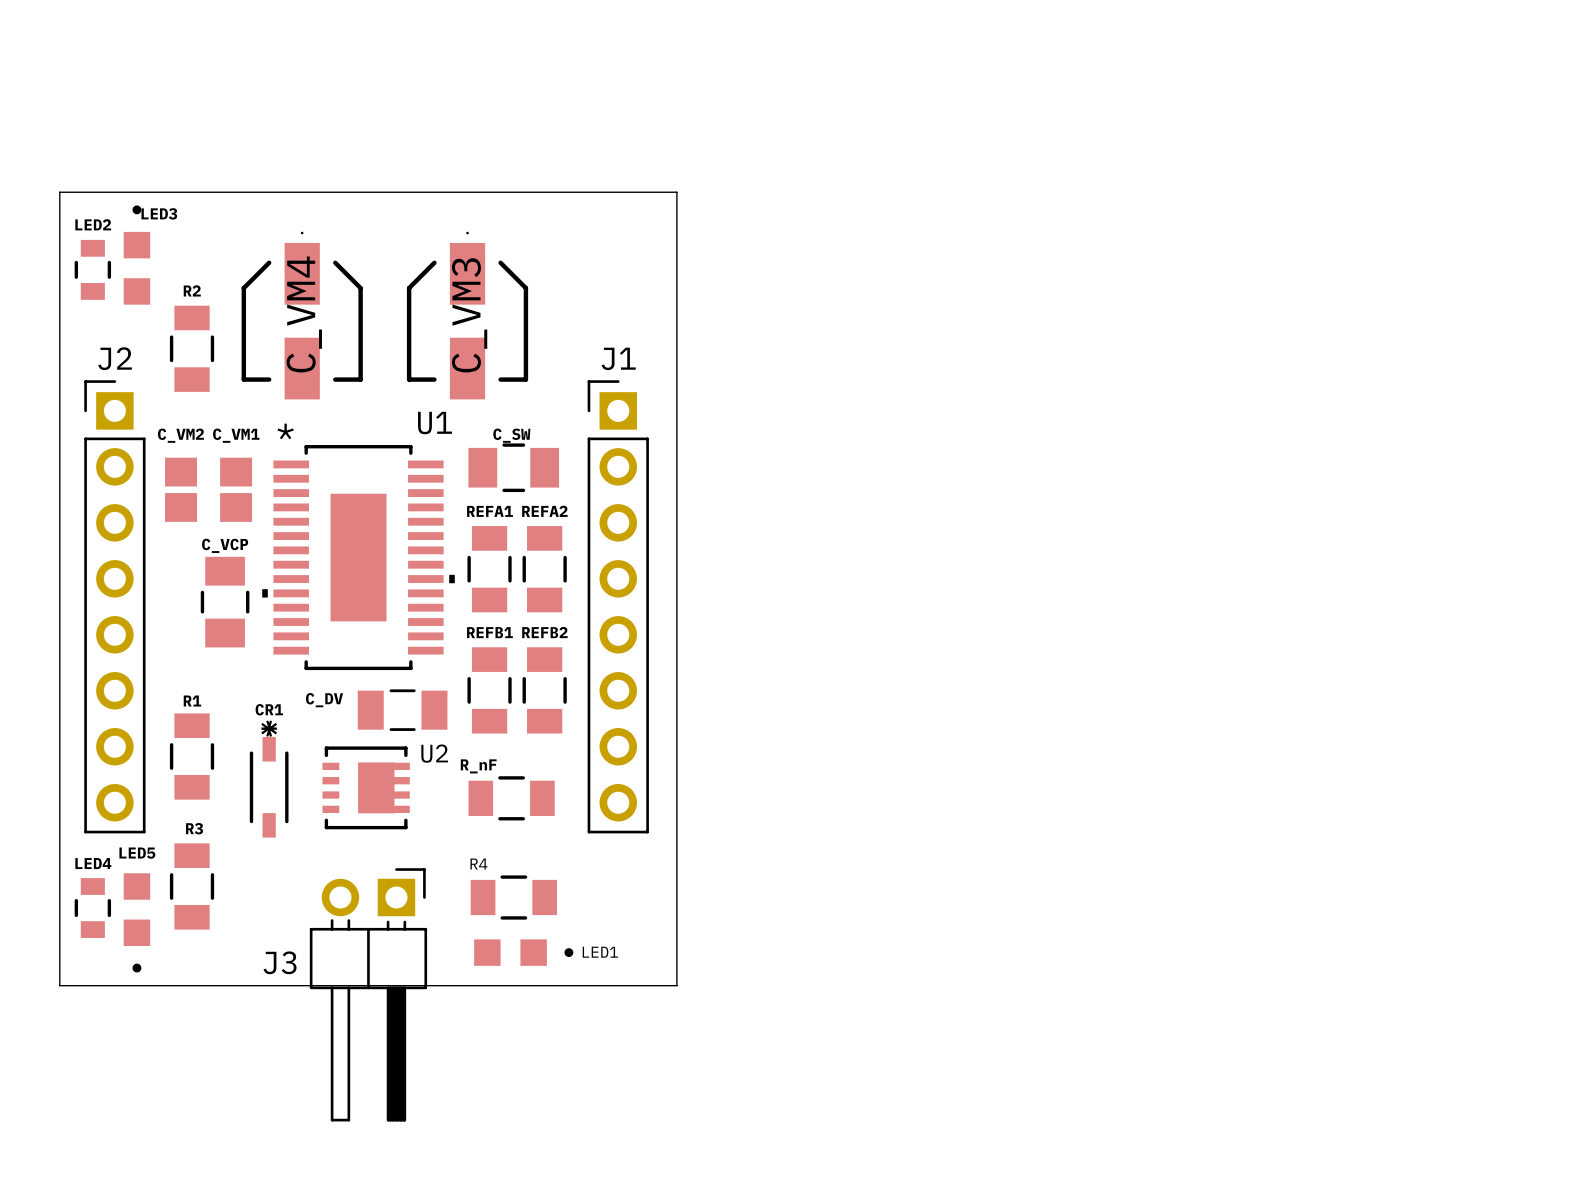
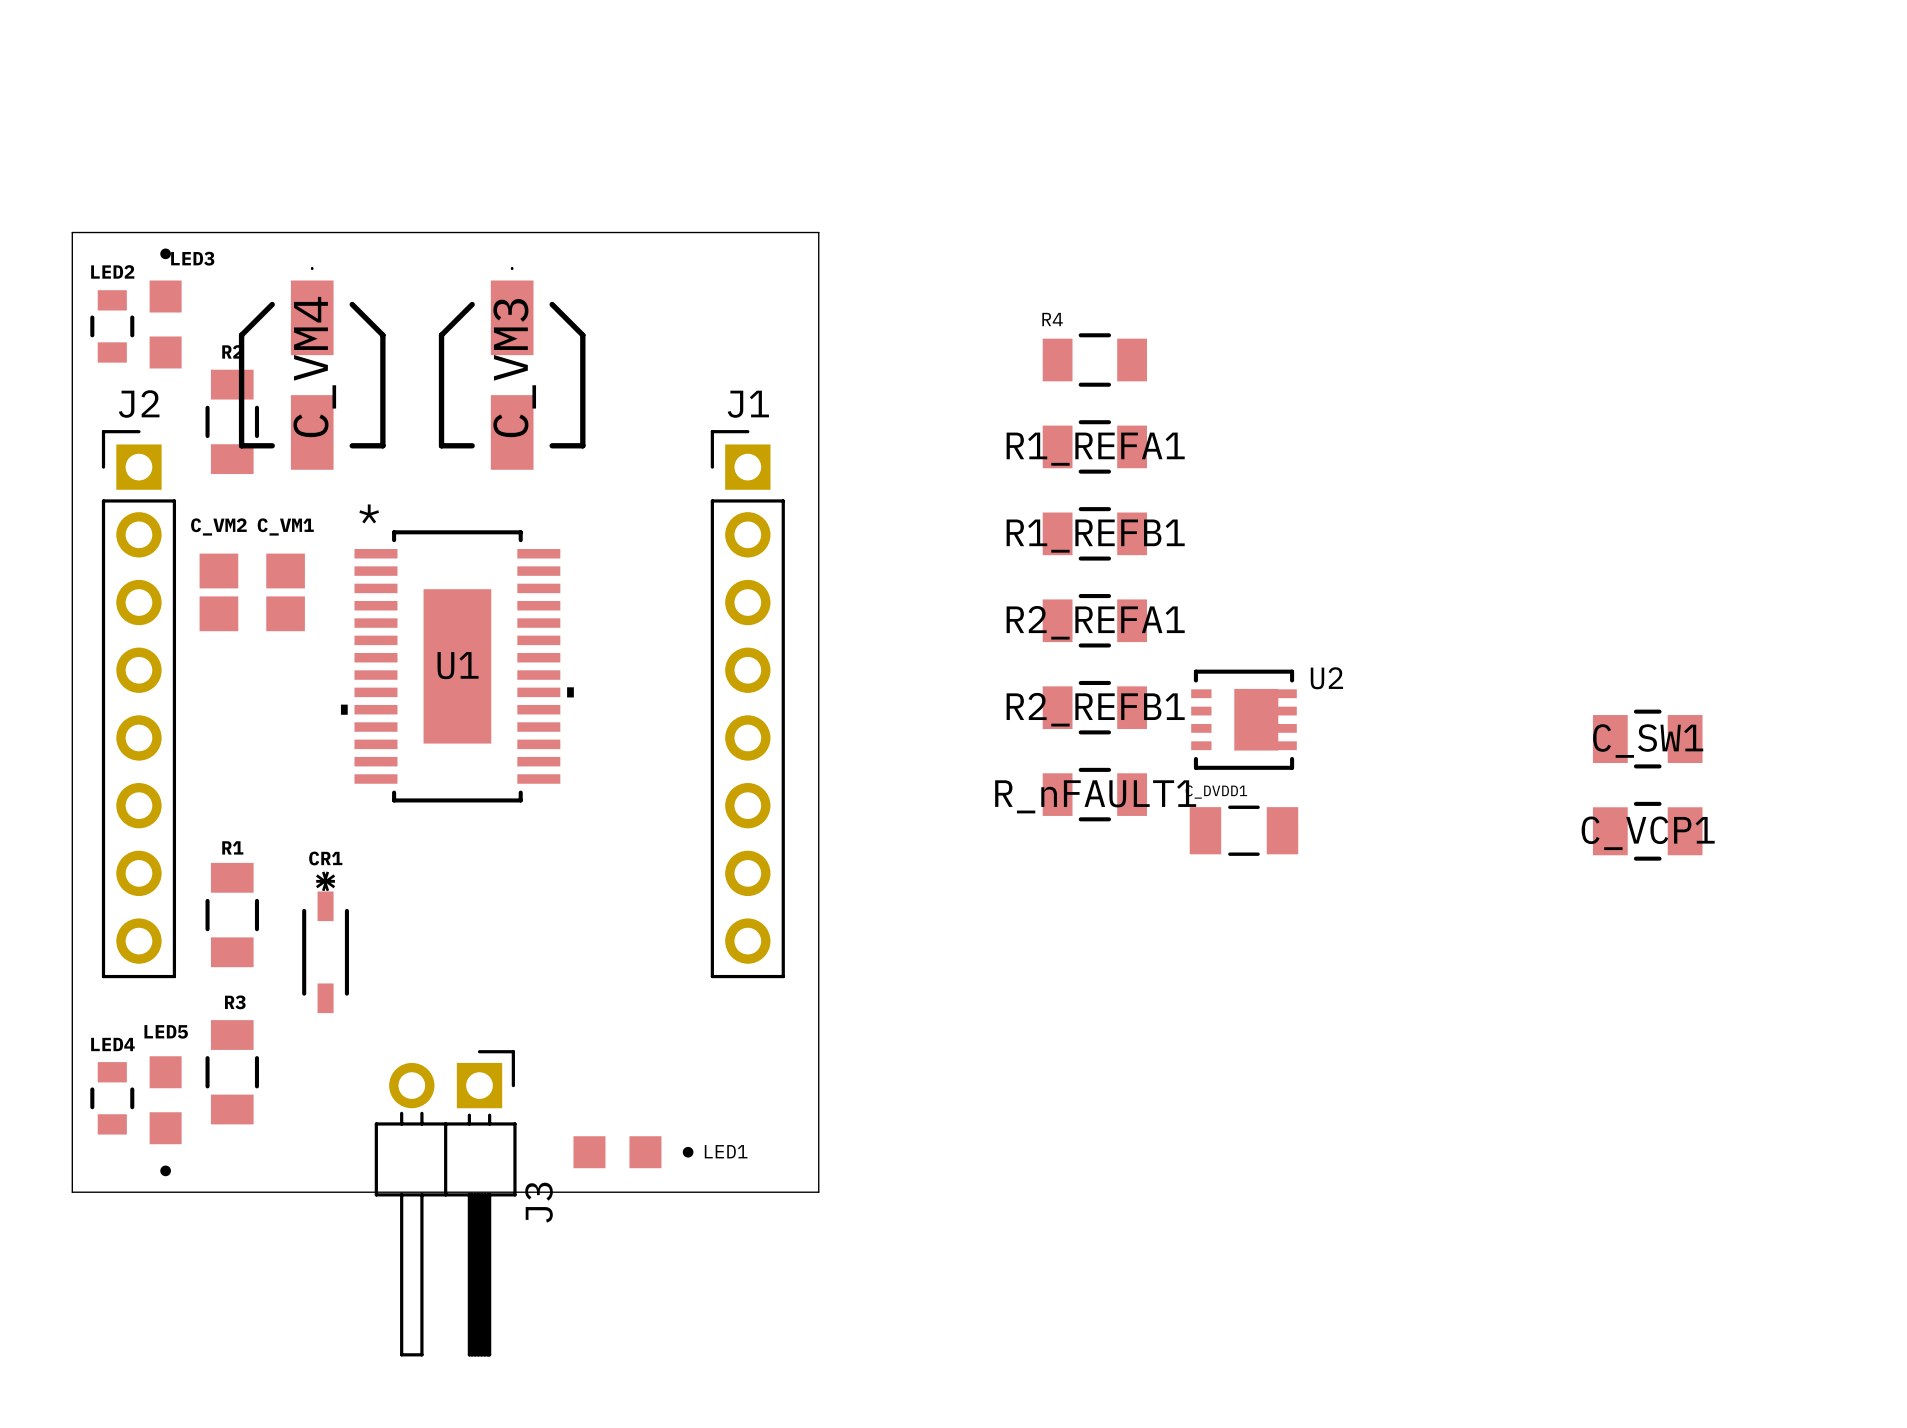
C_VM4 position: (302, 315) -> (312, 368)
C_VM3 position: (467, 315) -> (512, 368)
R1_REFA1: none -> (1094, 446)
U1 name position: U1 (434, 423) -> U1 (458, 665)
R1_REFB1: none -> (1094, 533)
C_SW: (513, 467) -> none
R2_REFA1: none -> (1094, 620)
U1 position: (358, 557) -> (457, 666)
REFA1: (489, 569) -> none
REFA2: (544, 569) -> none
R2_REFB1: none -> (1094, 707)
C_VCP: (225, 602) -> none
J2 position: (114, 606) -> (138, 704)
J1 position: (618, 606) -> (747, 704)
C_SW1: none -> (1647, 739)
R_nFAULT1: none -> (1094, 794)
C_DVDD1: none -> (1243, 830)
C_VCP1: none -> (1647, 831)
REFB1: (489, 690) -> none
REFB2: (544, 690) -> none
C_DV: (402, 710) -> none
U2 position: (366, 787) -> (1244, 719)
R_nF: (511, 798) -> none
R4 position: (513, 897) -> (1094, 360)
J3 name rotation: 0° (280, 962) -> 90° counterclockwise (539, 1202)
J3 name position: J3 (280, 962) -> J3 (539, 1202)

